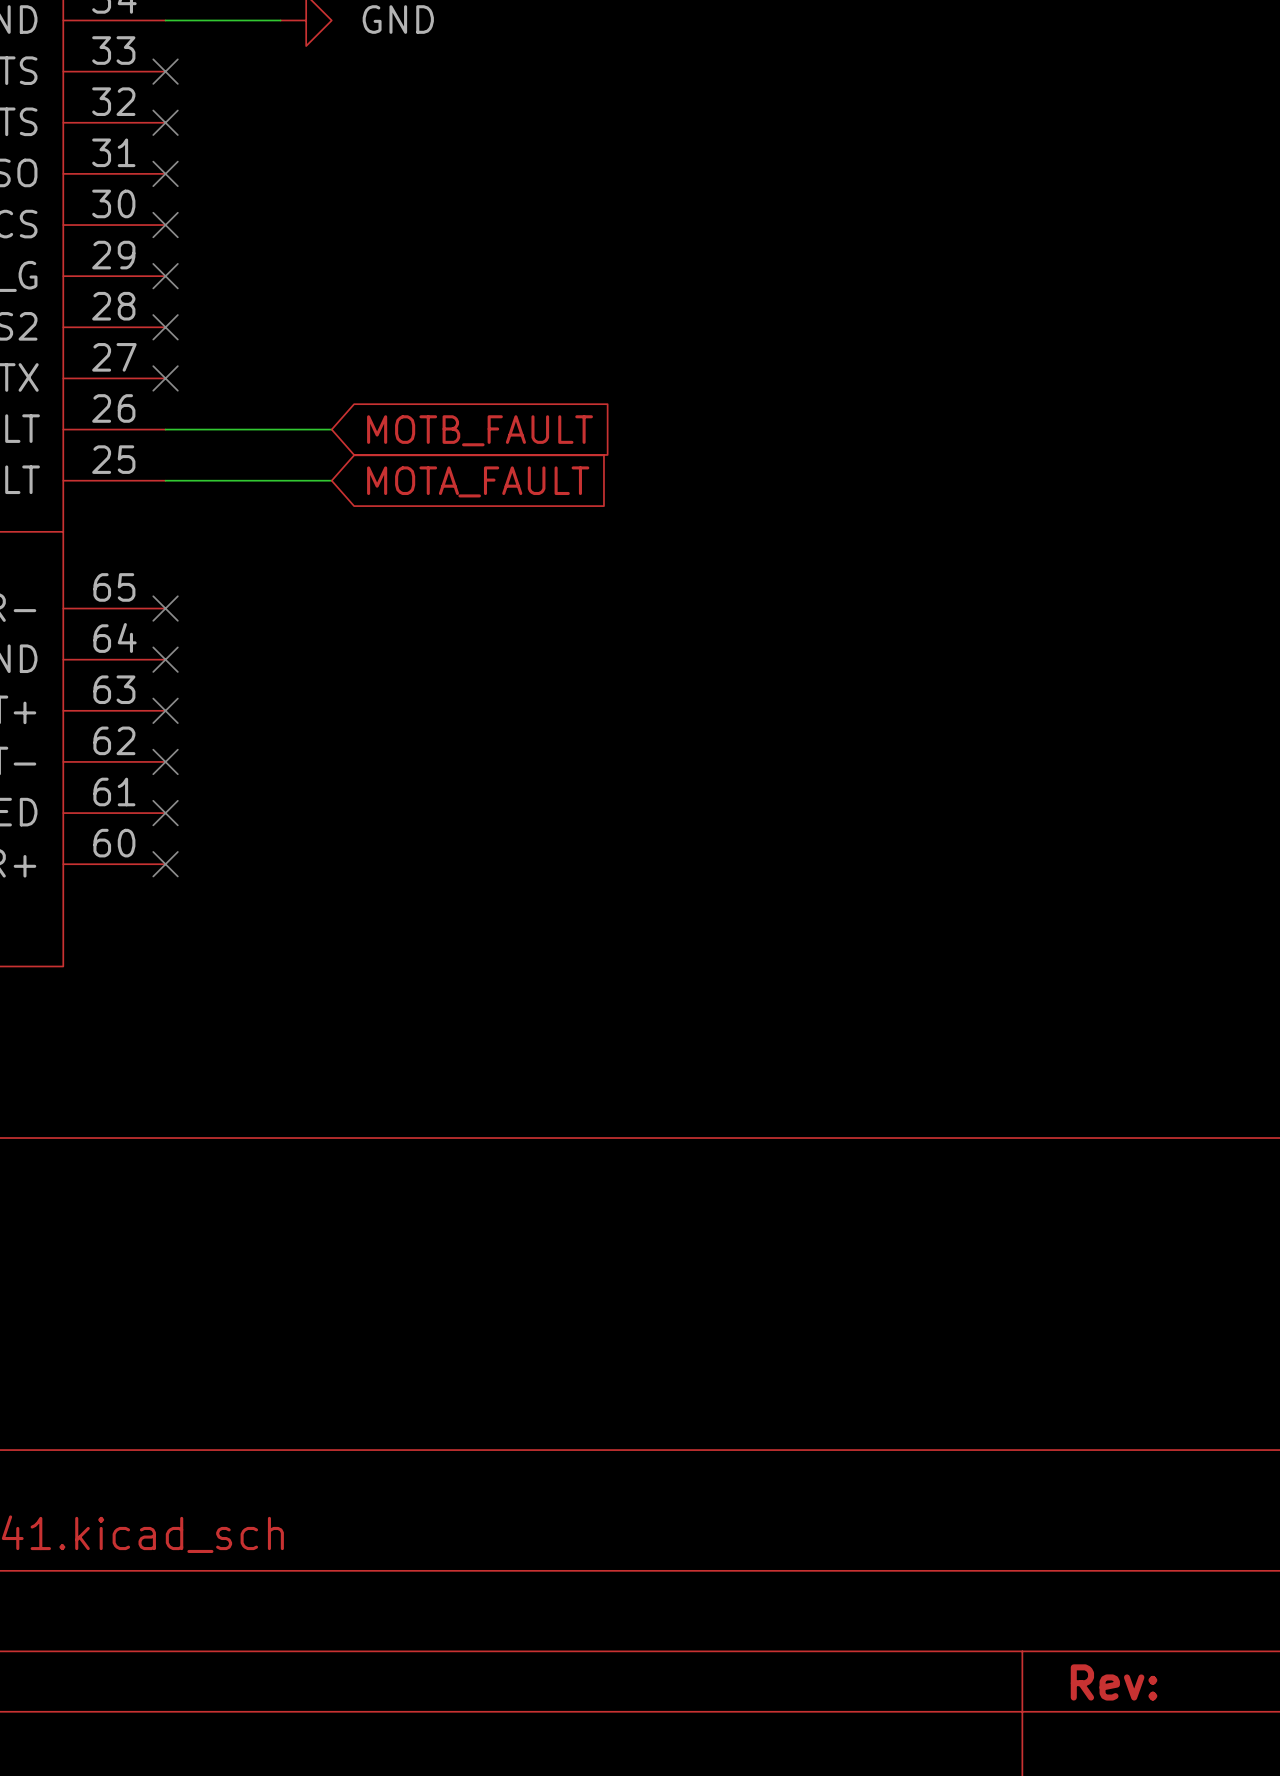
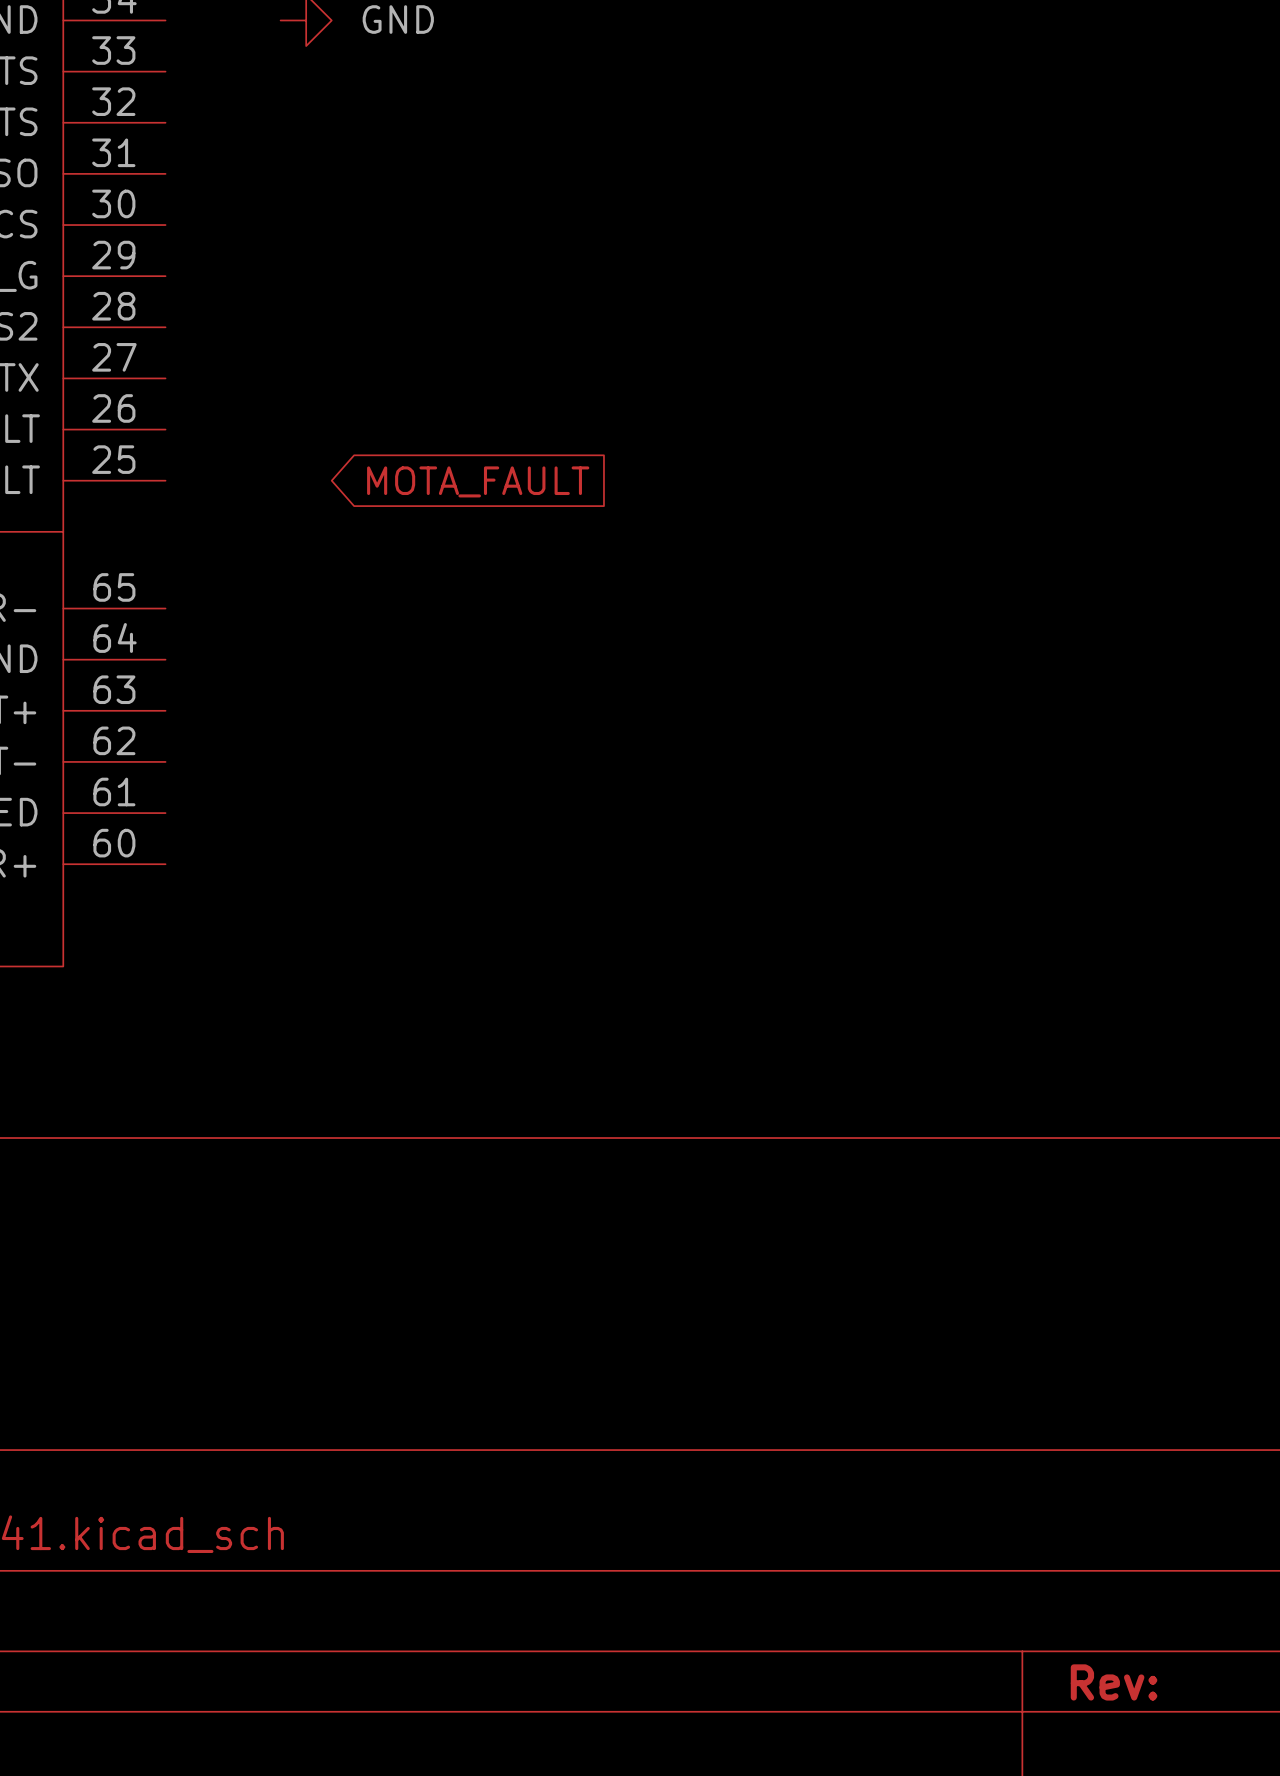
wire: (165, 20) (280, 20) -> none
no-connect mark: (165, 71) -> none
no-connect mark: (165, 122) -> none
no-connect mark: (165, 173) -> none
no-connect mark: (165, 225) -> none
no-connect mark: (165, 276) -> none
no-connect mark: (165, 327) -> none
no-connect mark: (165, 378) -> none
wire: (165, 429) (331, 429) -> none
global label: MOTB_FAULT (480, 430) -> none
wire: (165, 480) (331, 480) -> none
no-connect mark: (165, 608) -> none
no-connect mark: (165, 659) -> none
no-connect mark: (165, 710) -> none
no-connect mark: (165, 761) -> none
no-connect mark: (165, 813) -> none
no-connect mark: (165, 864) -> none

